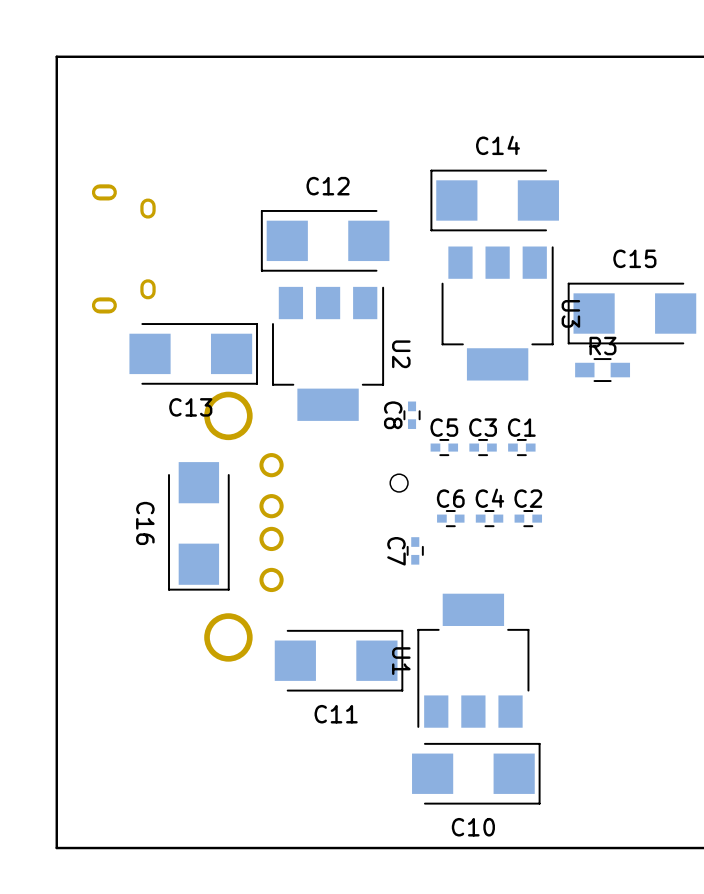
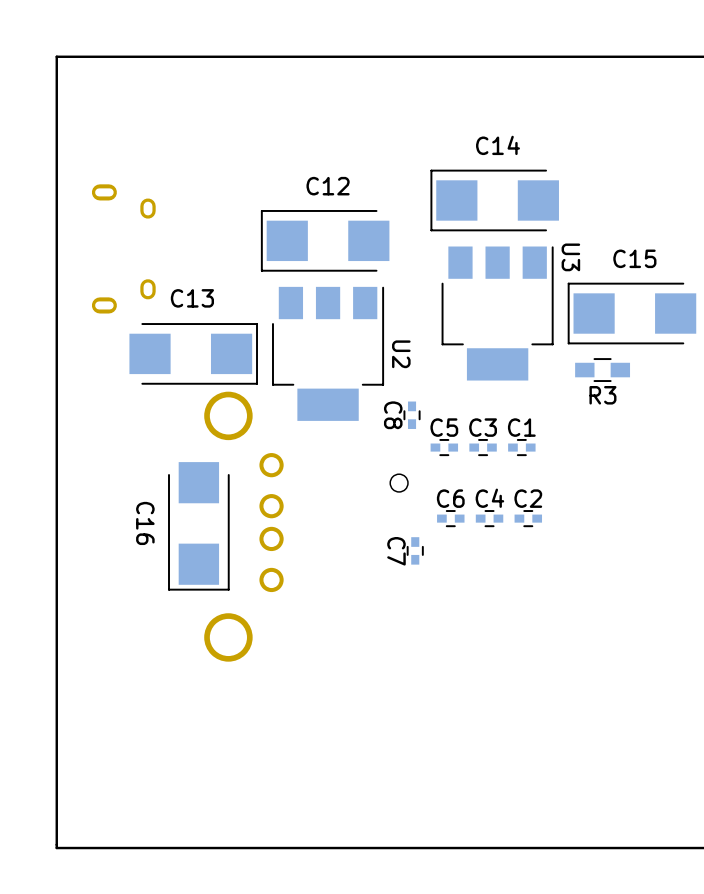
U3 name position: U3 (570, 313) -> U3 (570, 257)
R3 name position: R3 (602, 346) -> R3 (602, 395)
C13 name position: C13 (190, 407) -> C13 (192, 298)
C11: (339, 660) -> none
U1: (473, 660) -> none
C10: (476, 773) -> none

